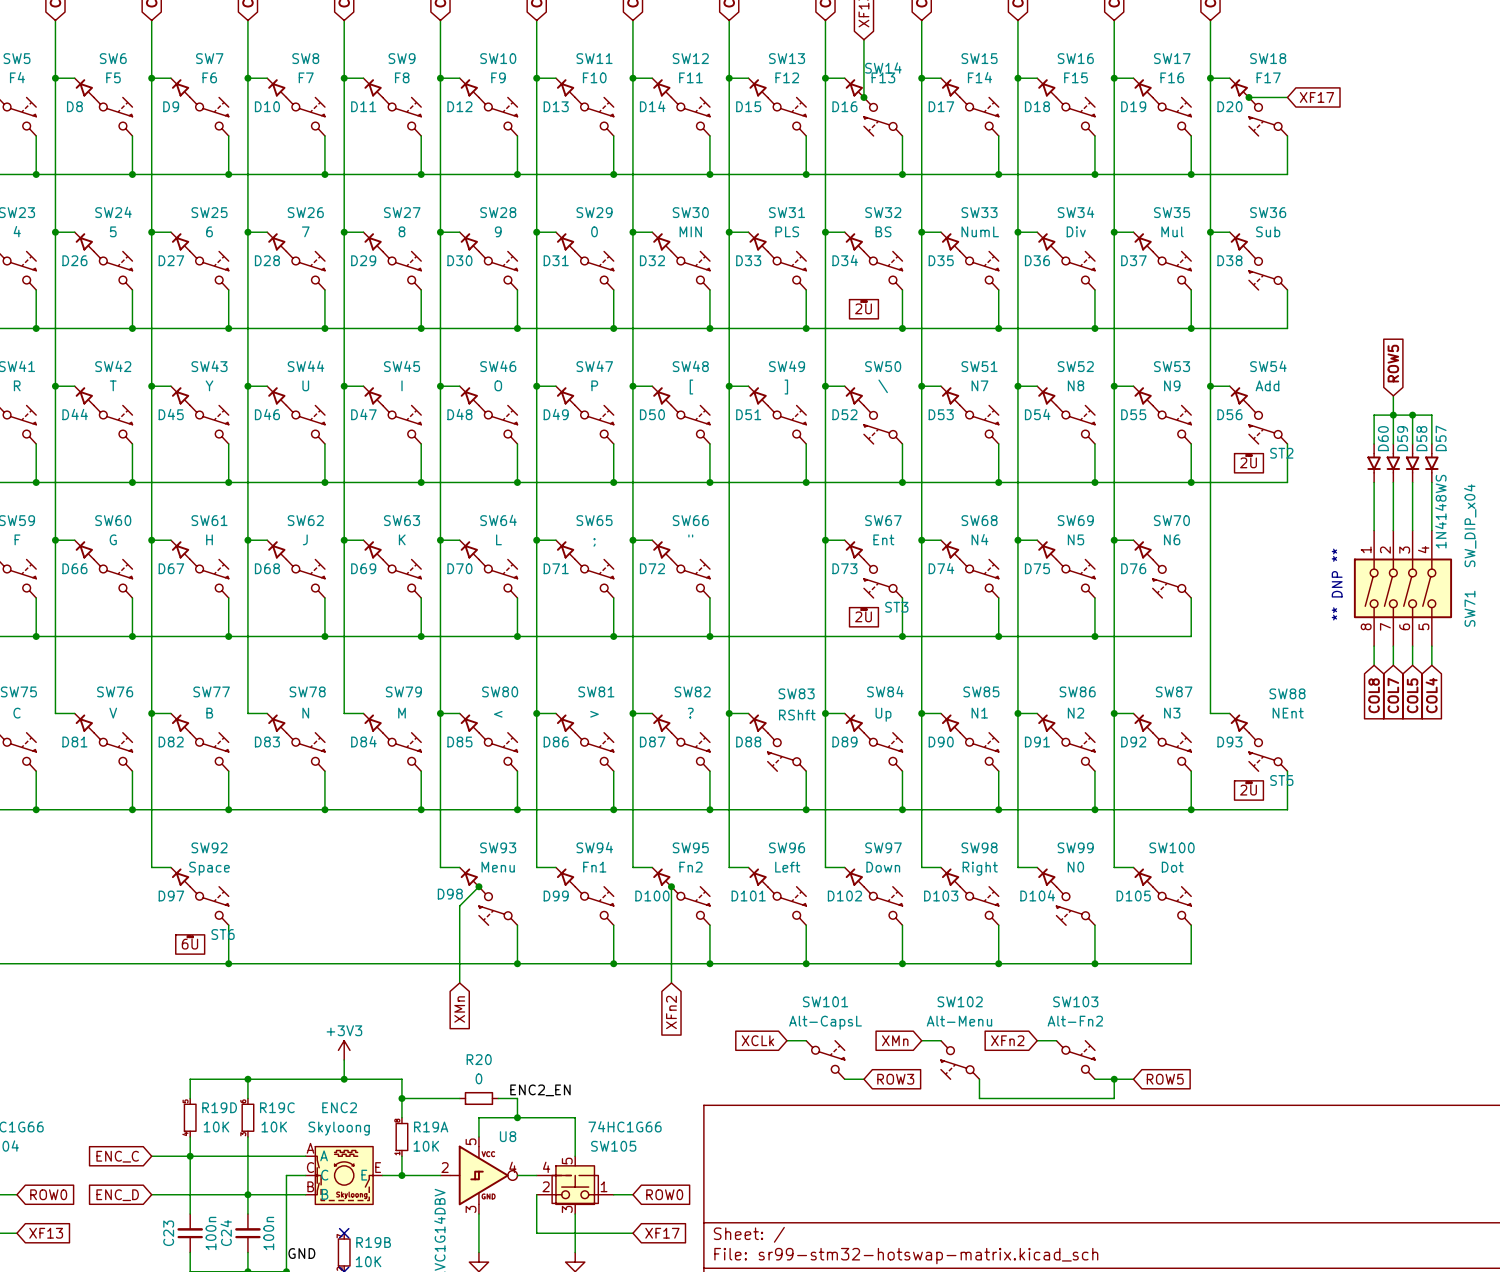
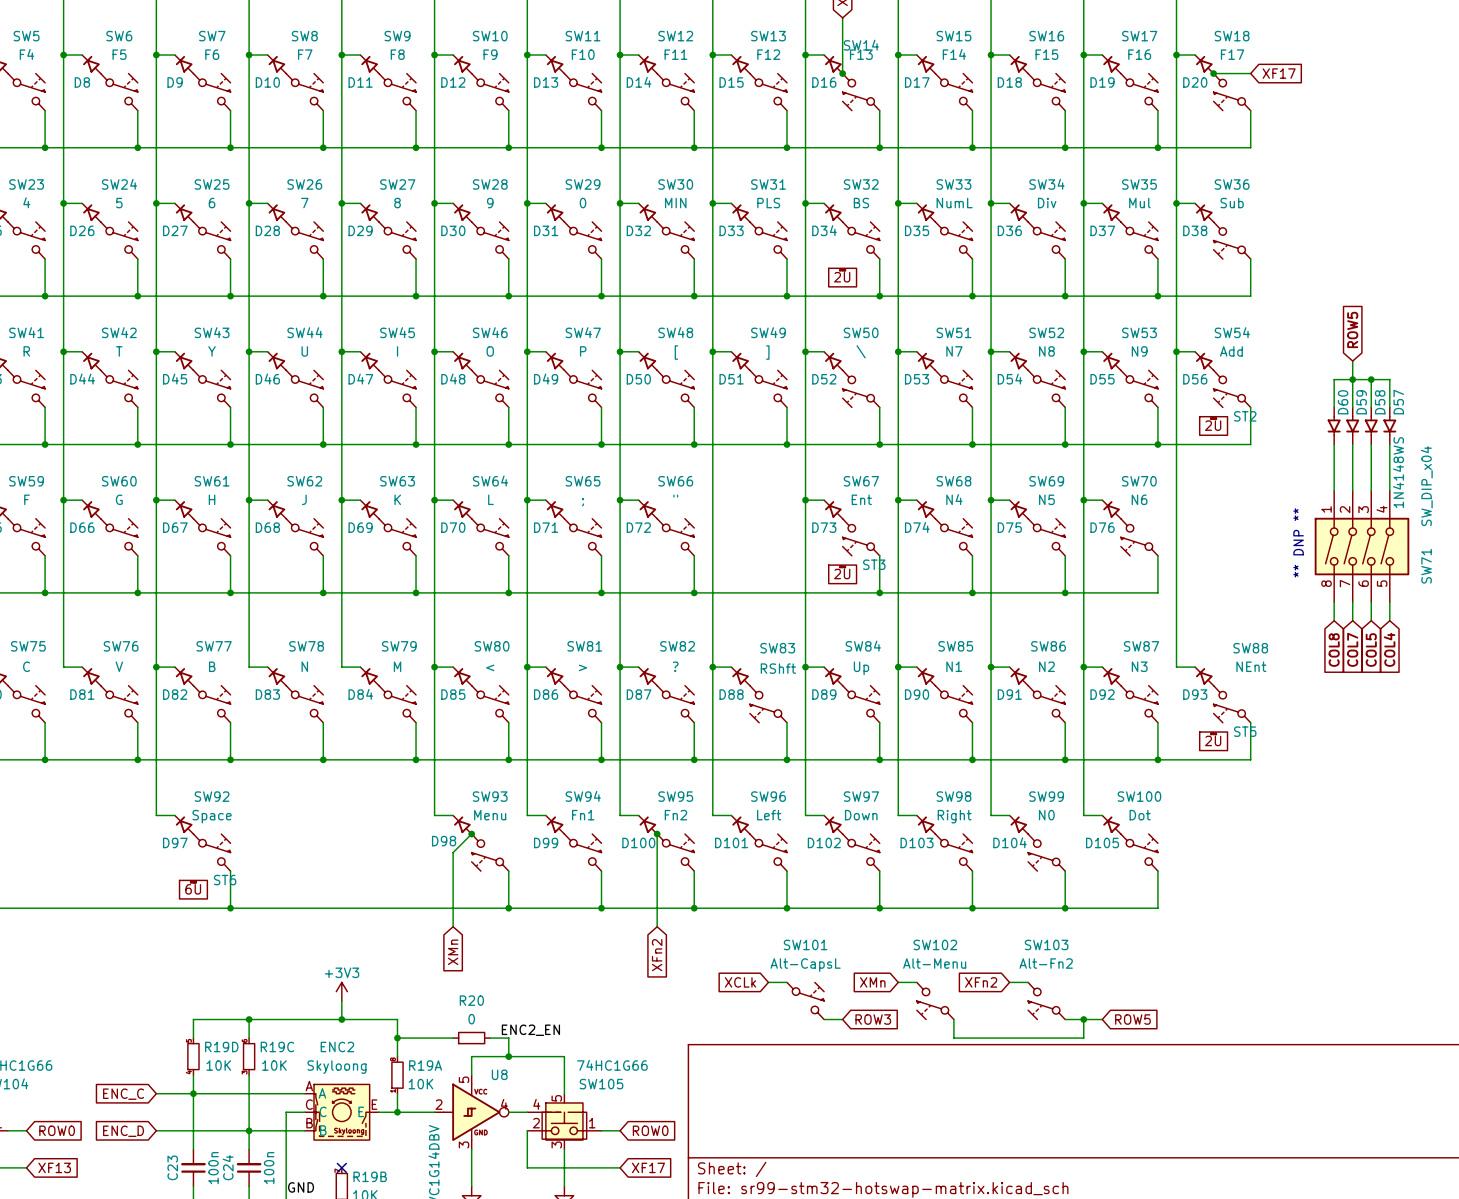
SW103 rotation: 0° (1075, 1059) -> 180° (1046, 1000)

